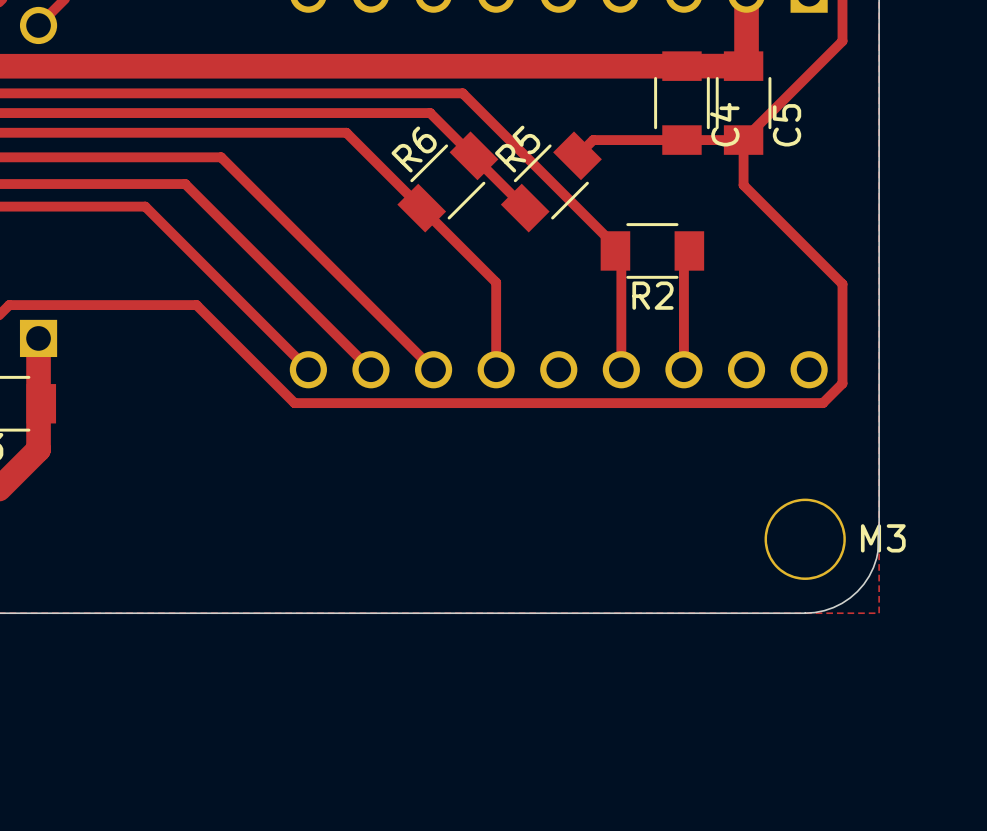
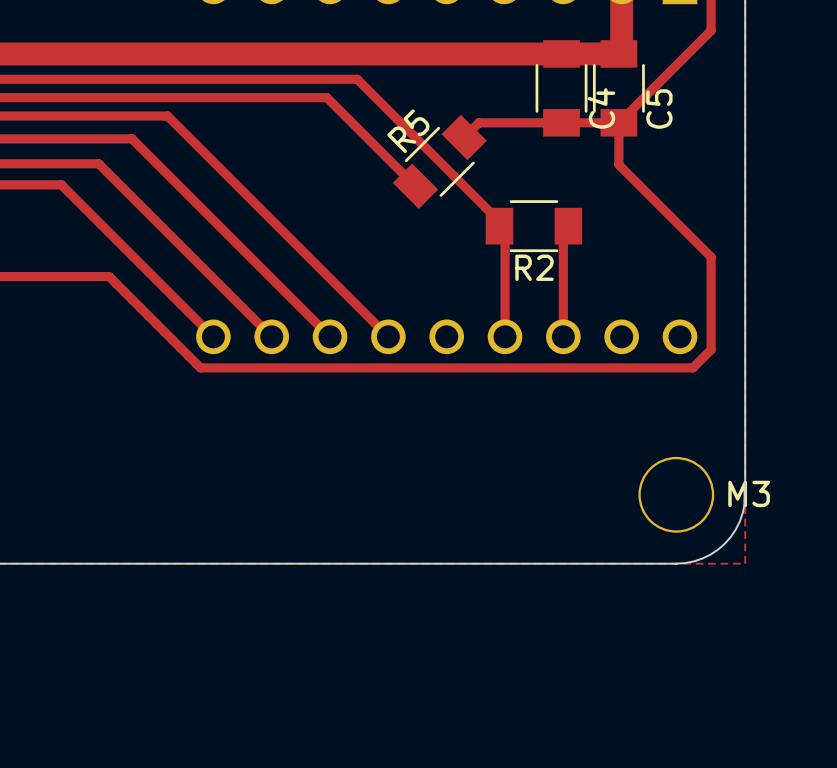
top track: (259, 132) (346, 132) (496, 282) (496, 369) -> (167, 116) (388, 336)
R6: (447, 181) -> none

